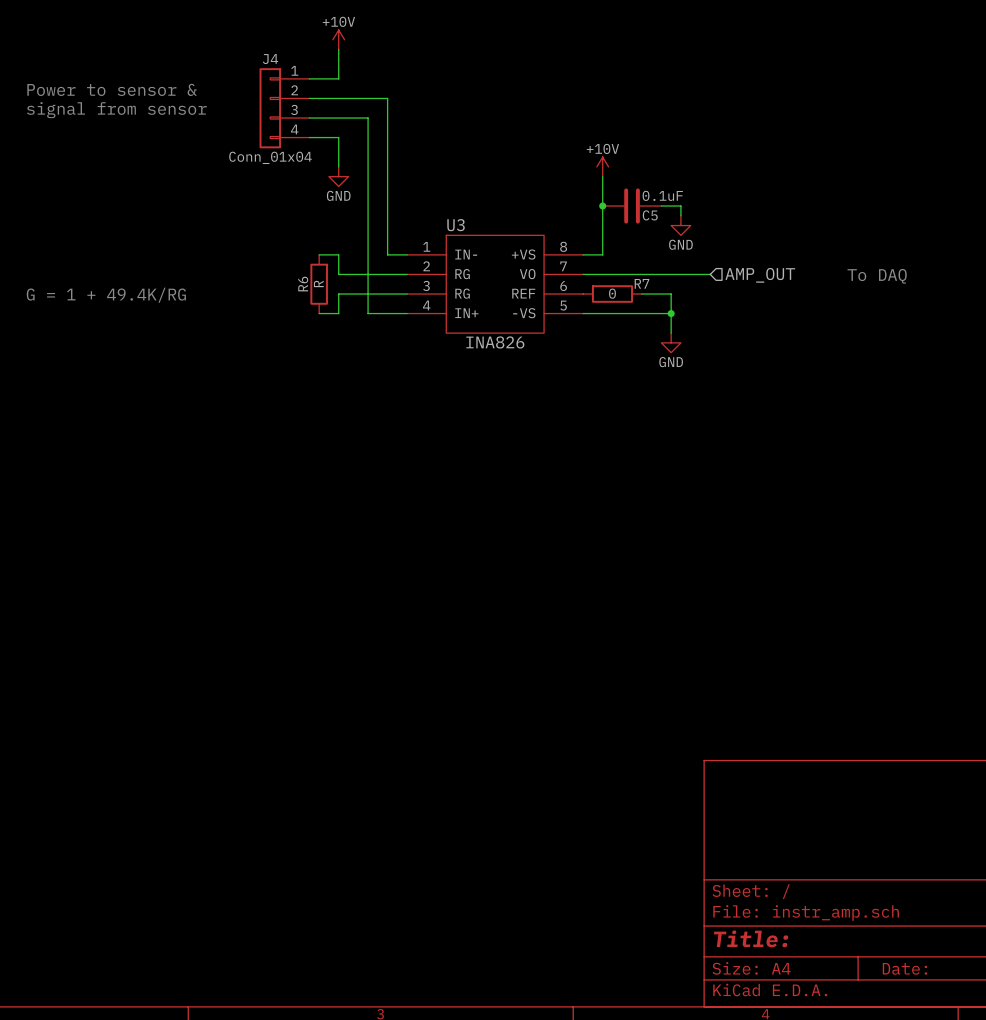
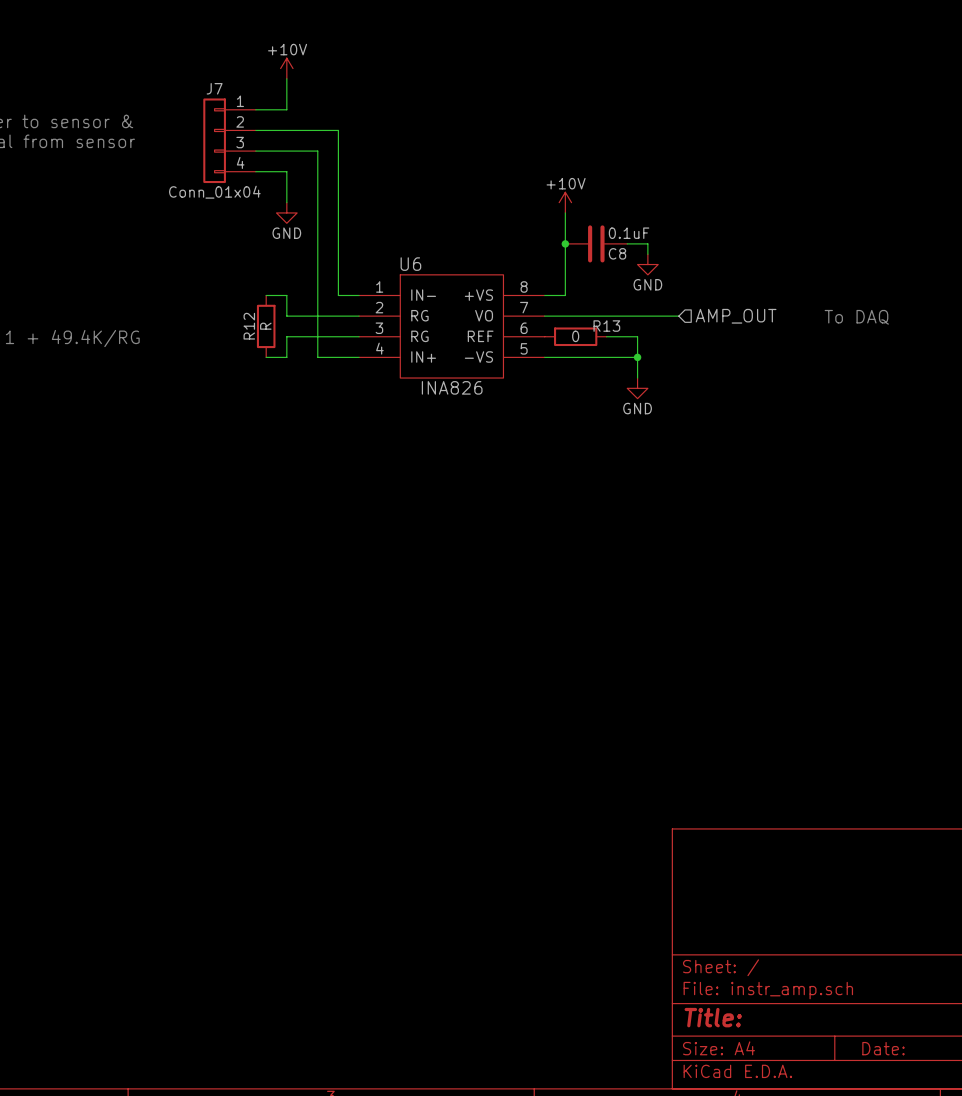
J4 name: J4 (270, 59) -> J7 (214, 88)
C5 name: C5 (650, 215) -> C8 (617, 253)
U3 name: U3 (456, 225) -> U6 (410, 264)
R7 name: R7 (641, 283) -> R13 (606, 326)
R6 name: R6 (303, 284) -> R12 (249, 326)

